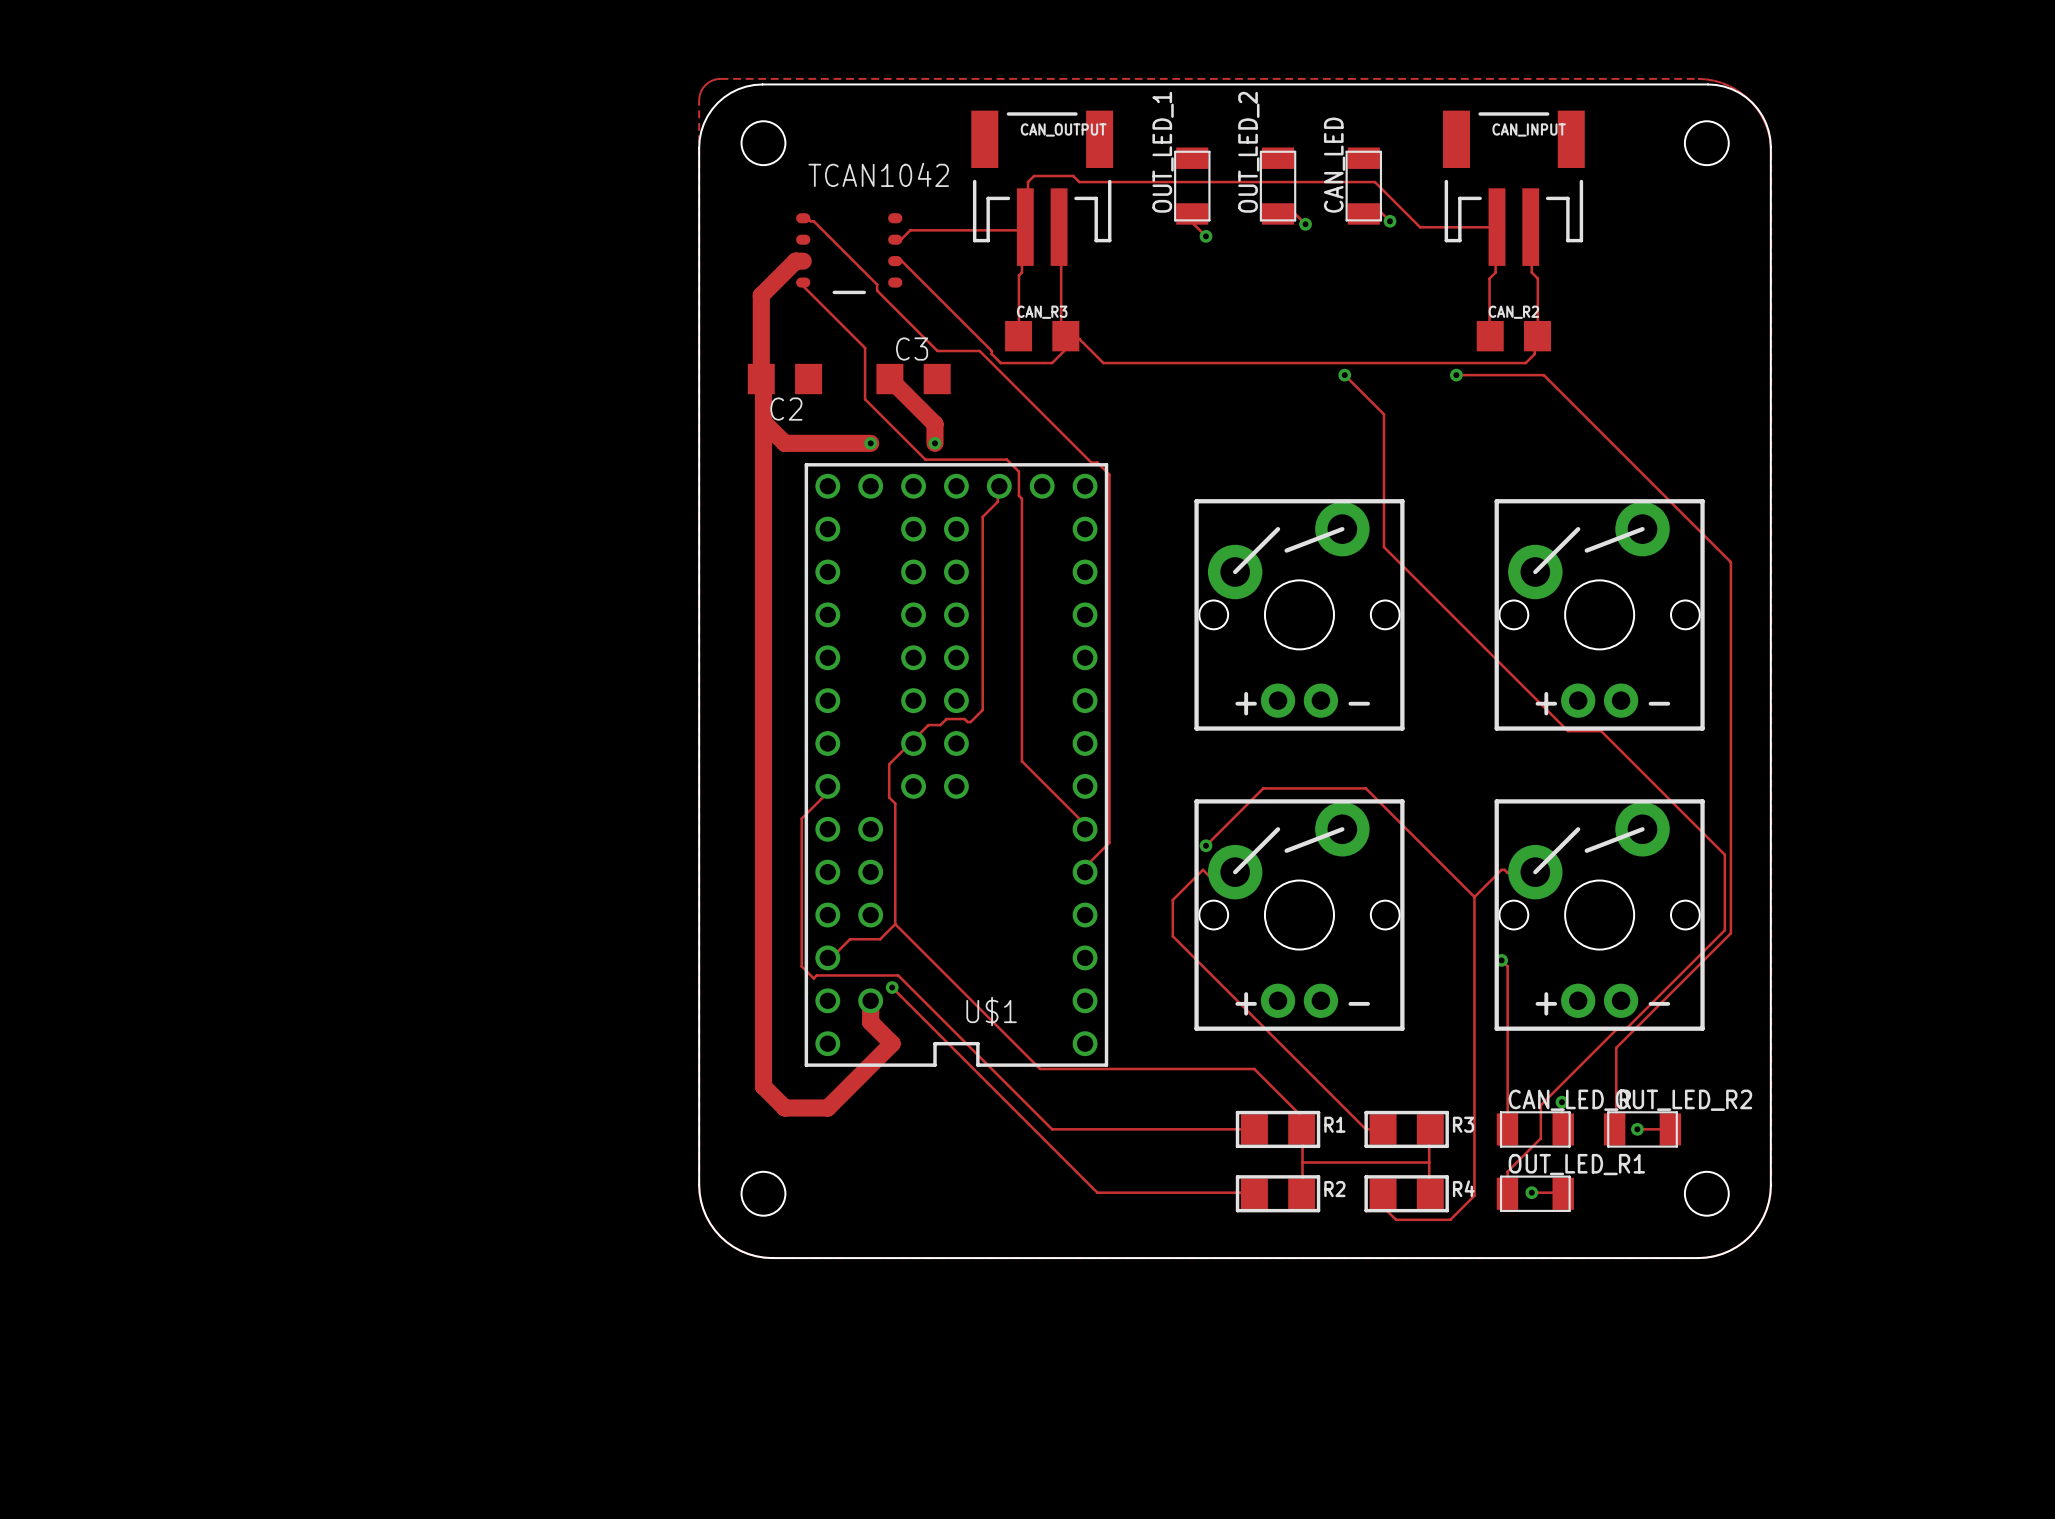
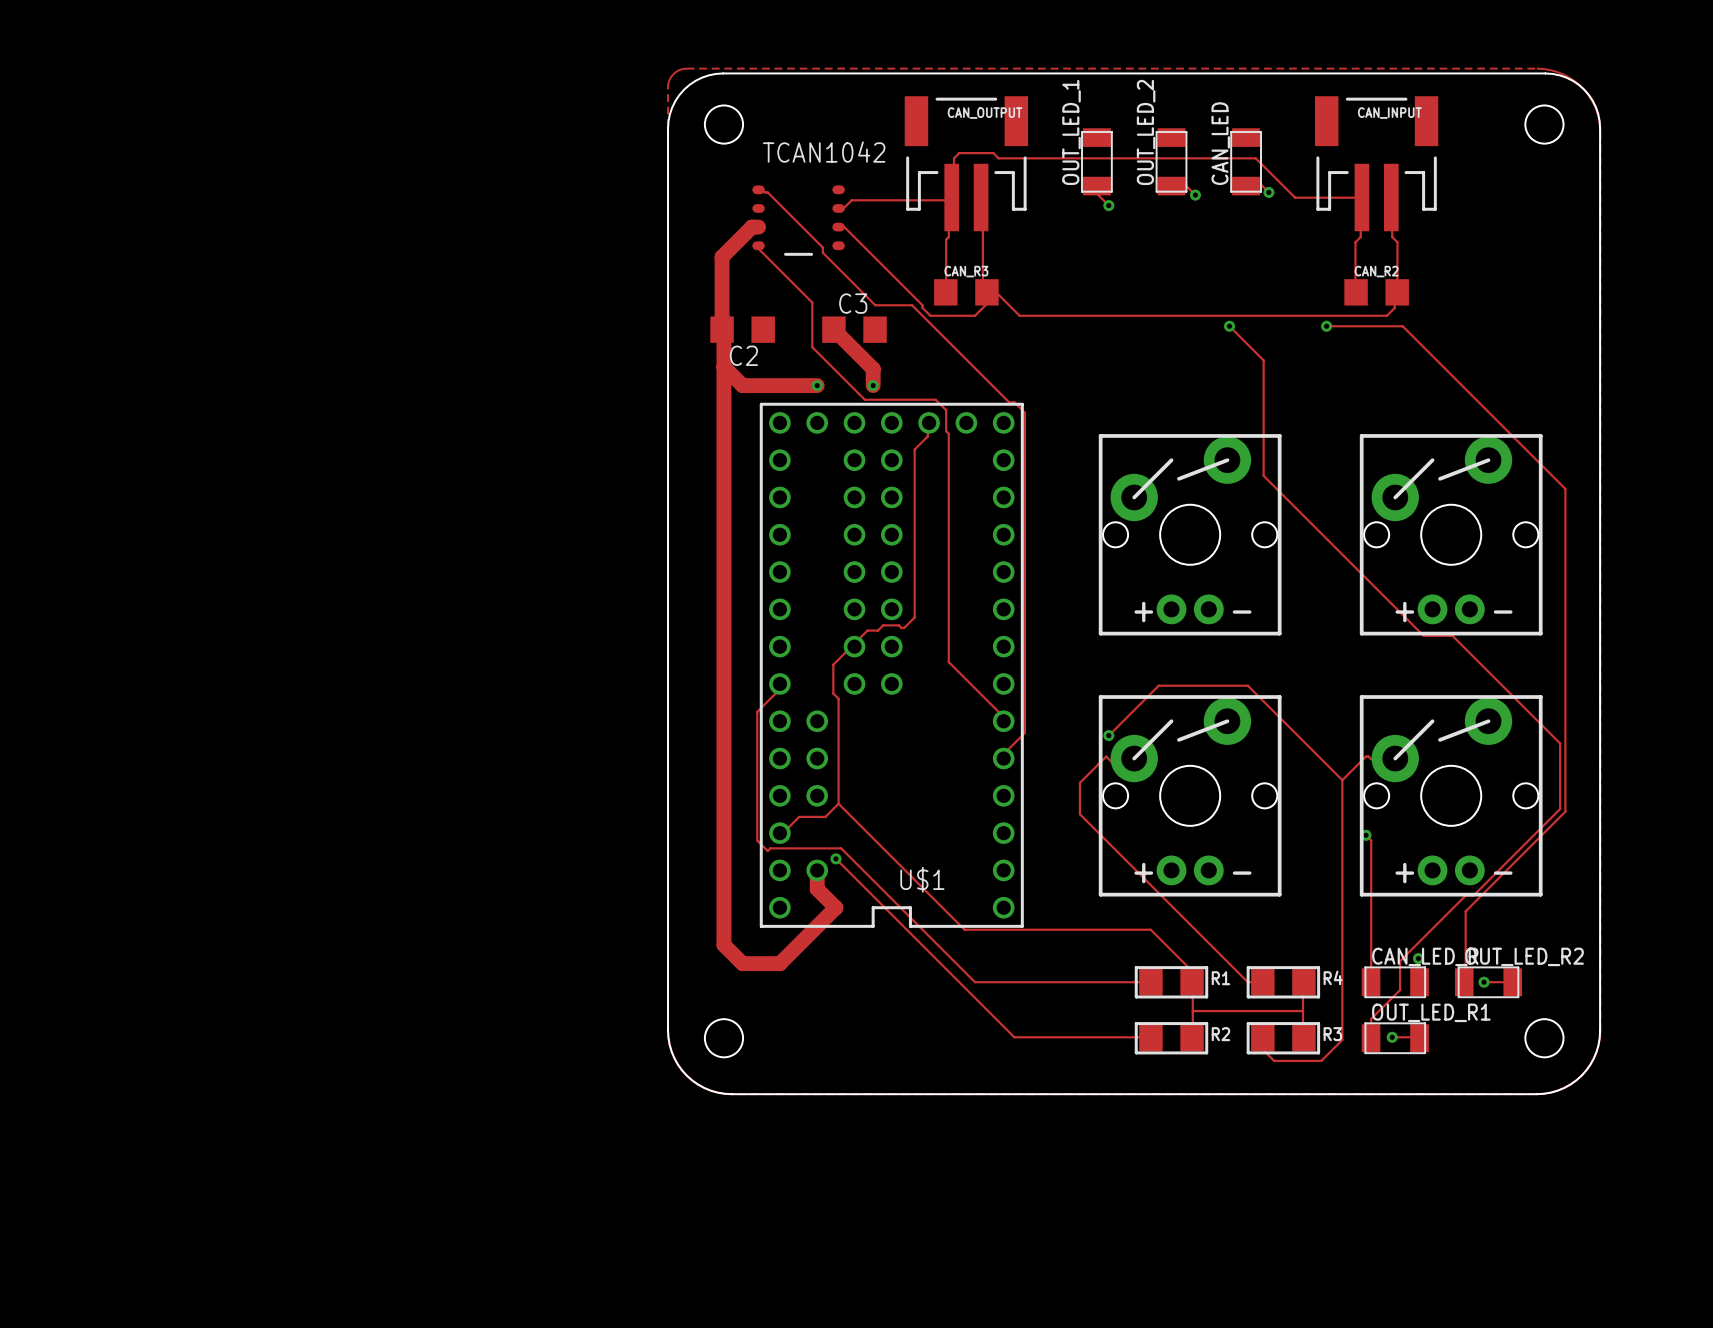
R3 name: R3 (1463, 1124) -> R4 (1333, 977)
R4 name: R4 (1463, 1188) -> R3 (1332, 1034)

